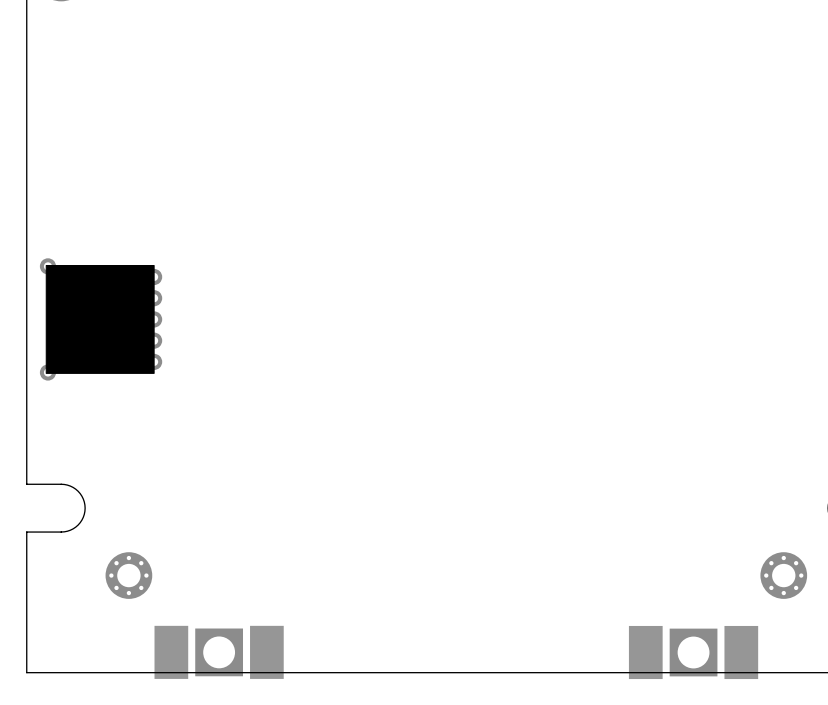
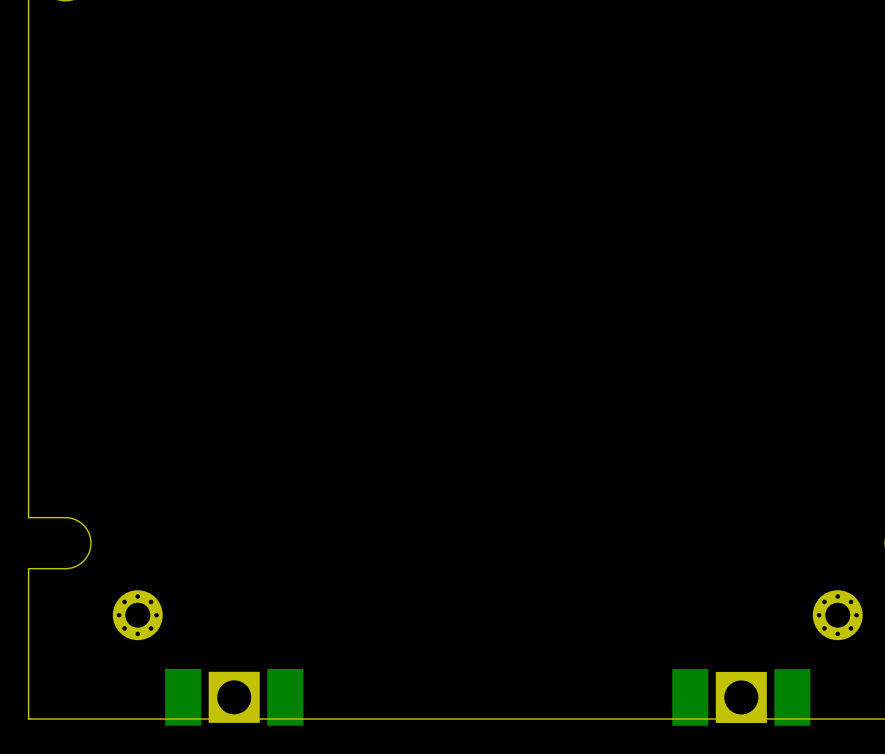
part: (101, 319) -> none

